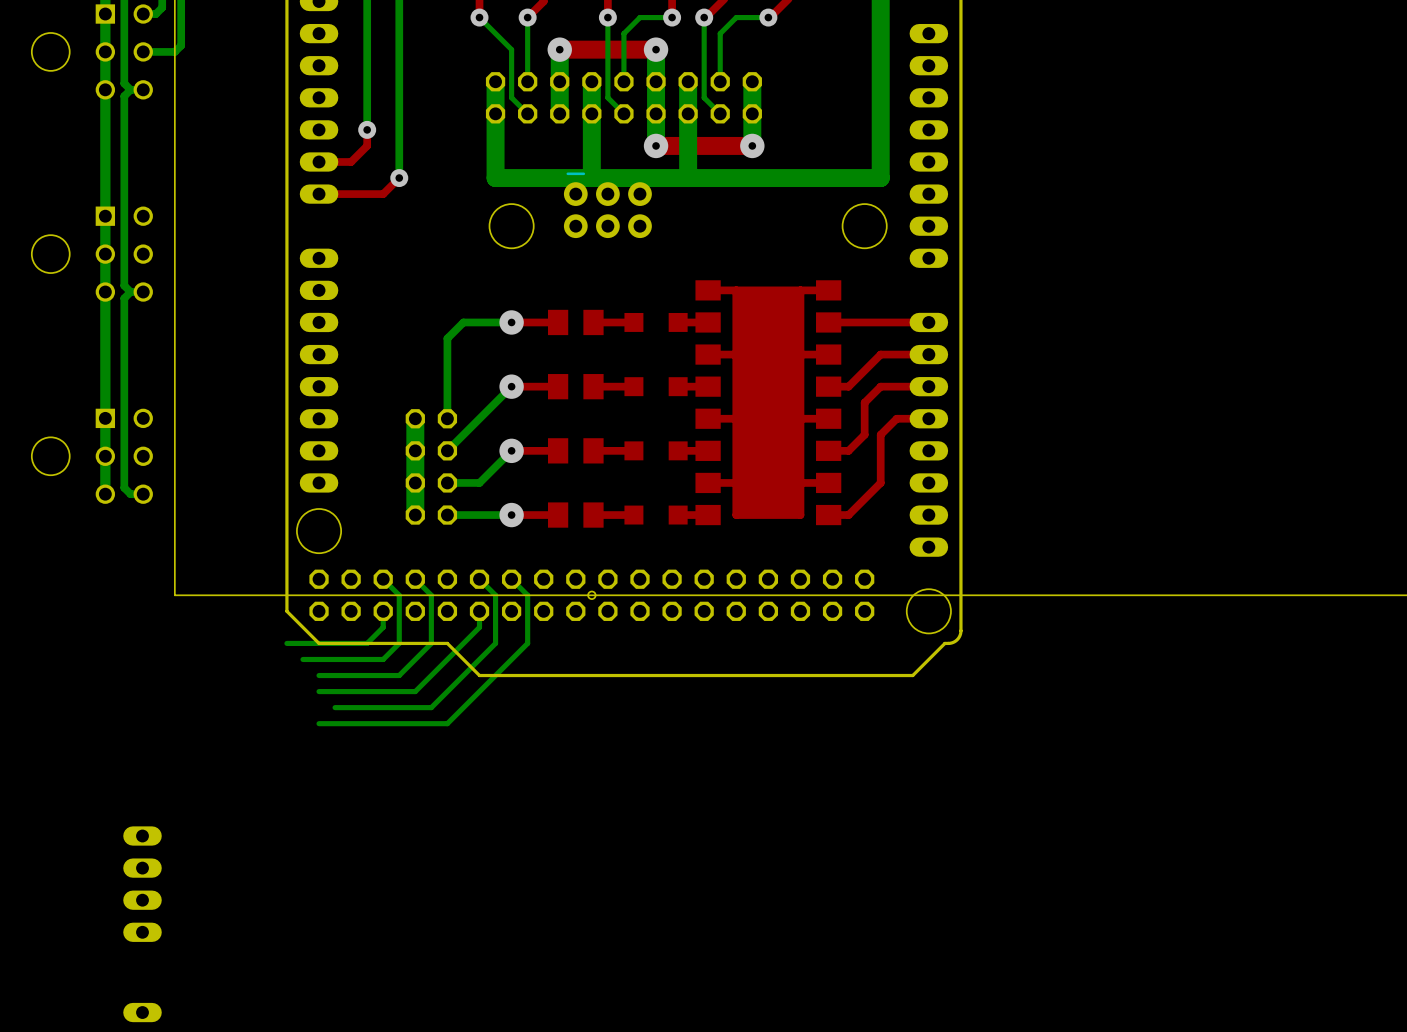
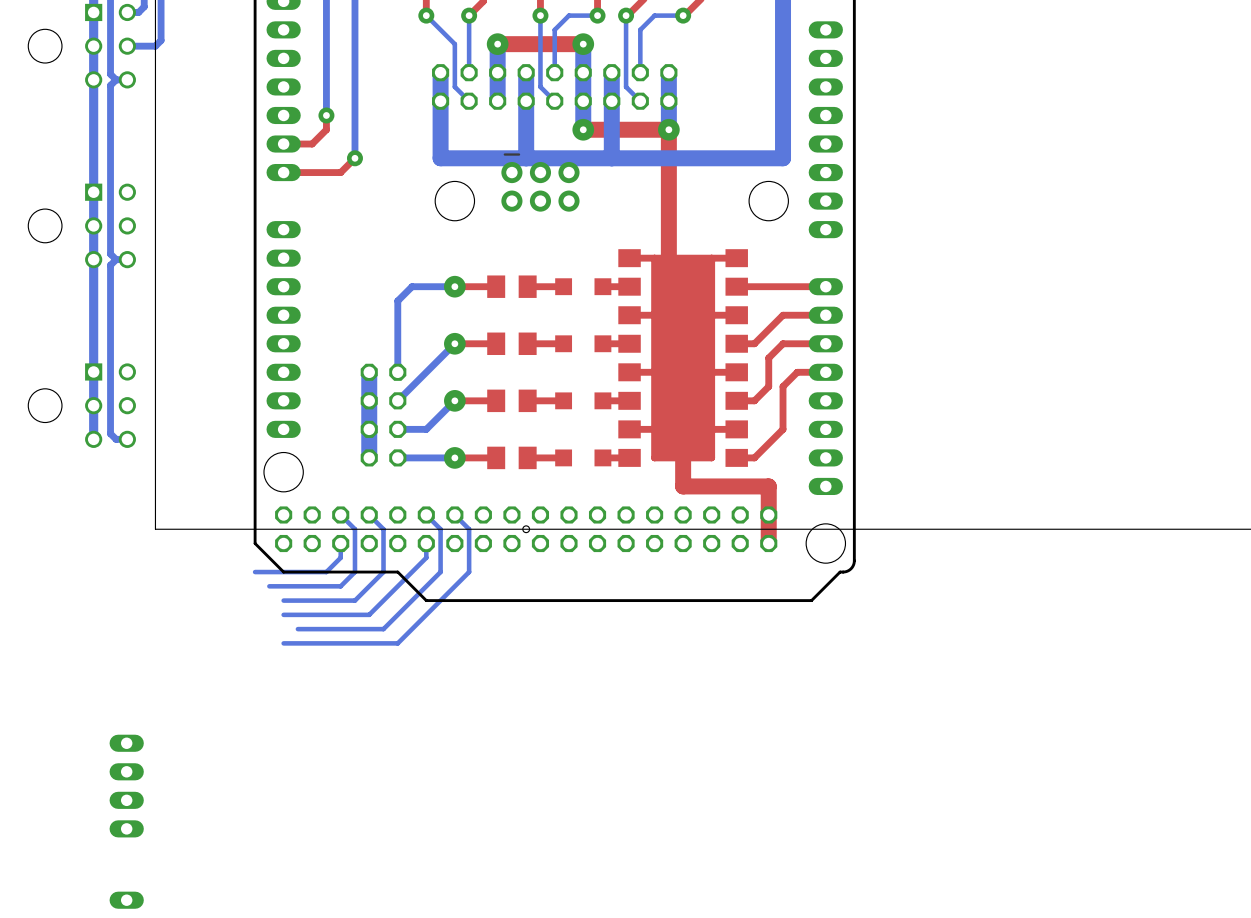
top track: none -> (668, 129) (668, 258)
top track: none -> (683, 429) (683, 486) (768, 486) (768, 543)

